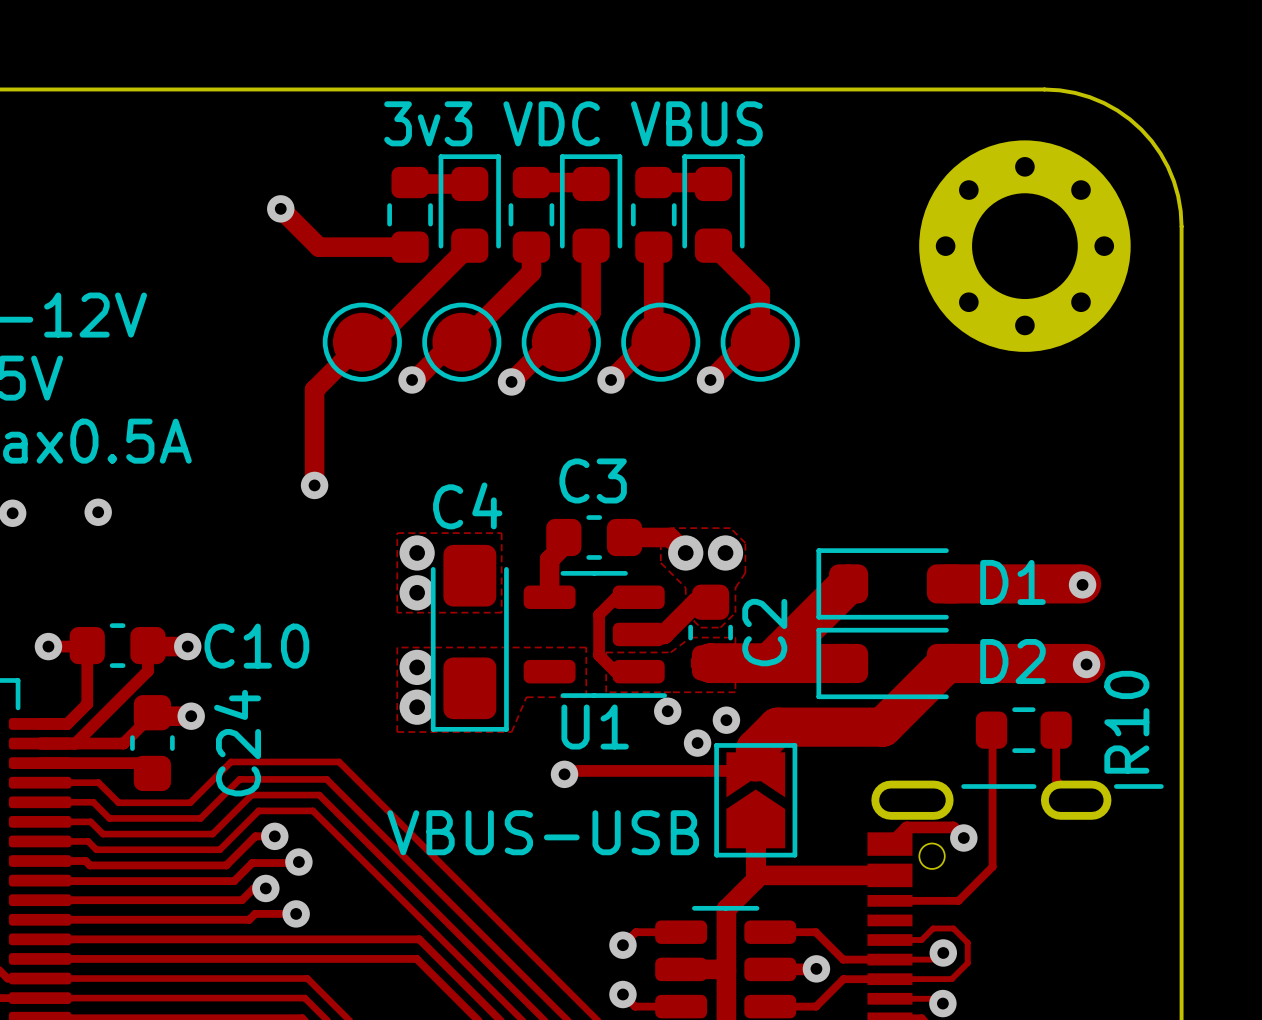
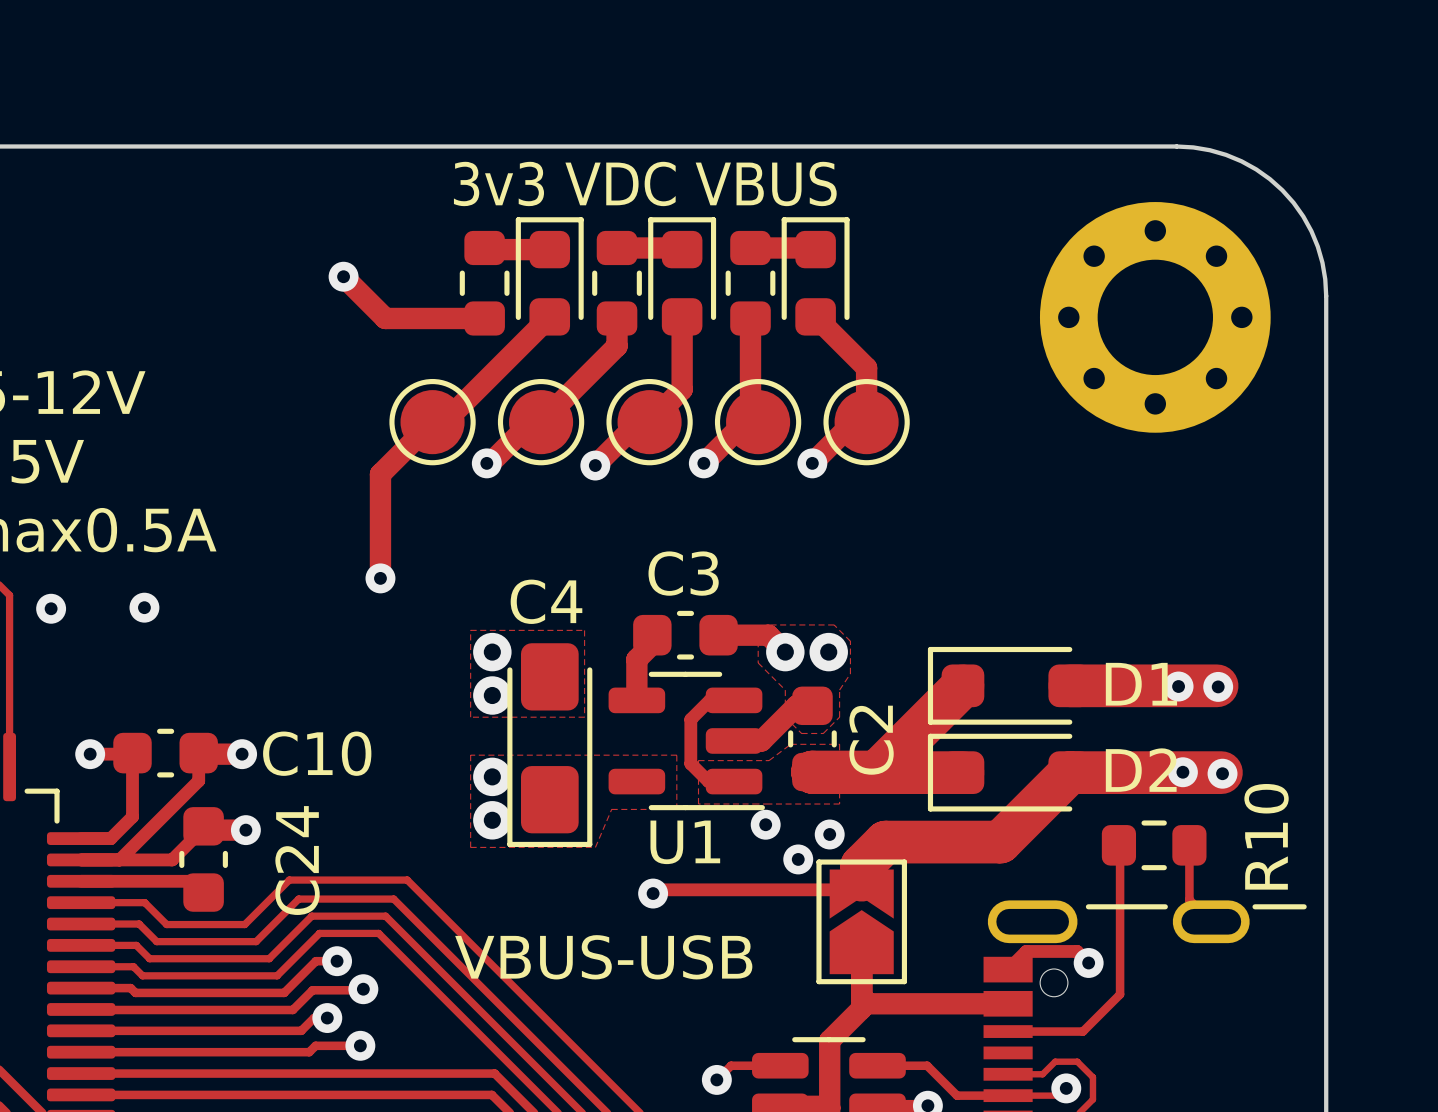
via: none -> (1178, 686)
via: none -> (1182, 772)

